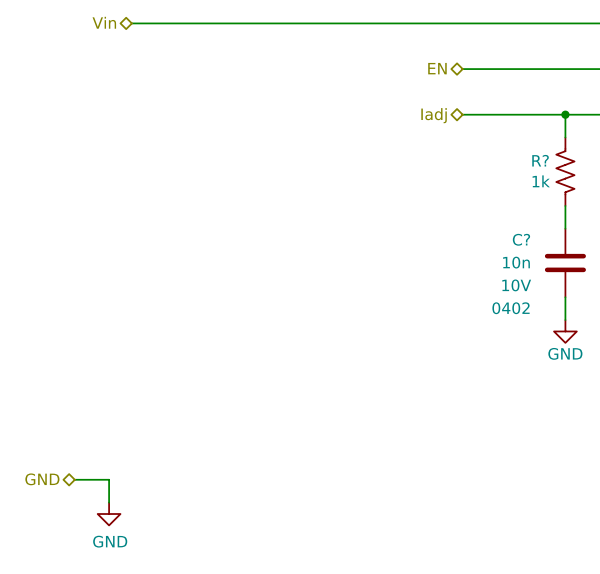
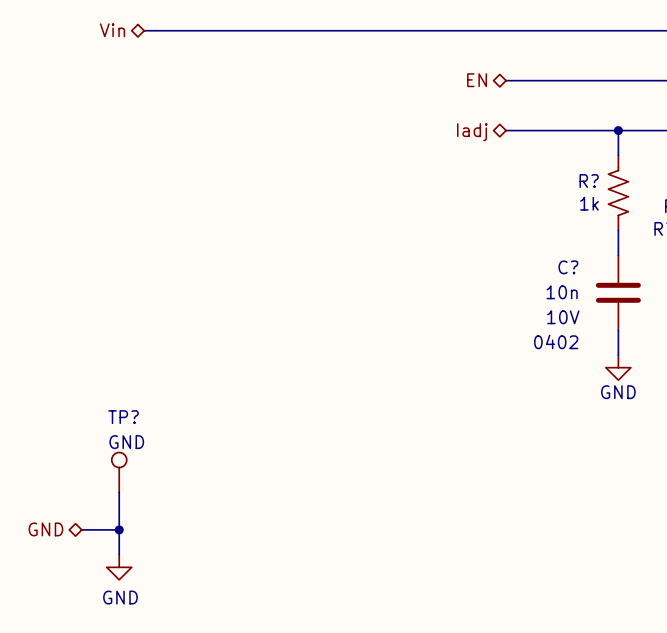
TP?: none -> GND (119, 472)
wire: none -> (119, 492) (119, 529)
junction: none -> (119, 529)

